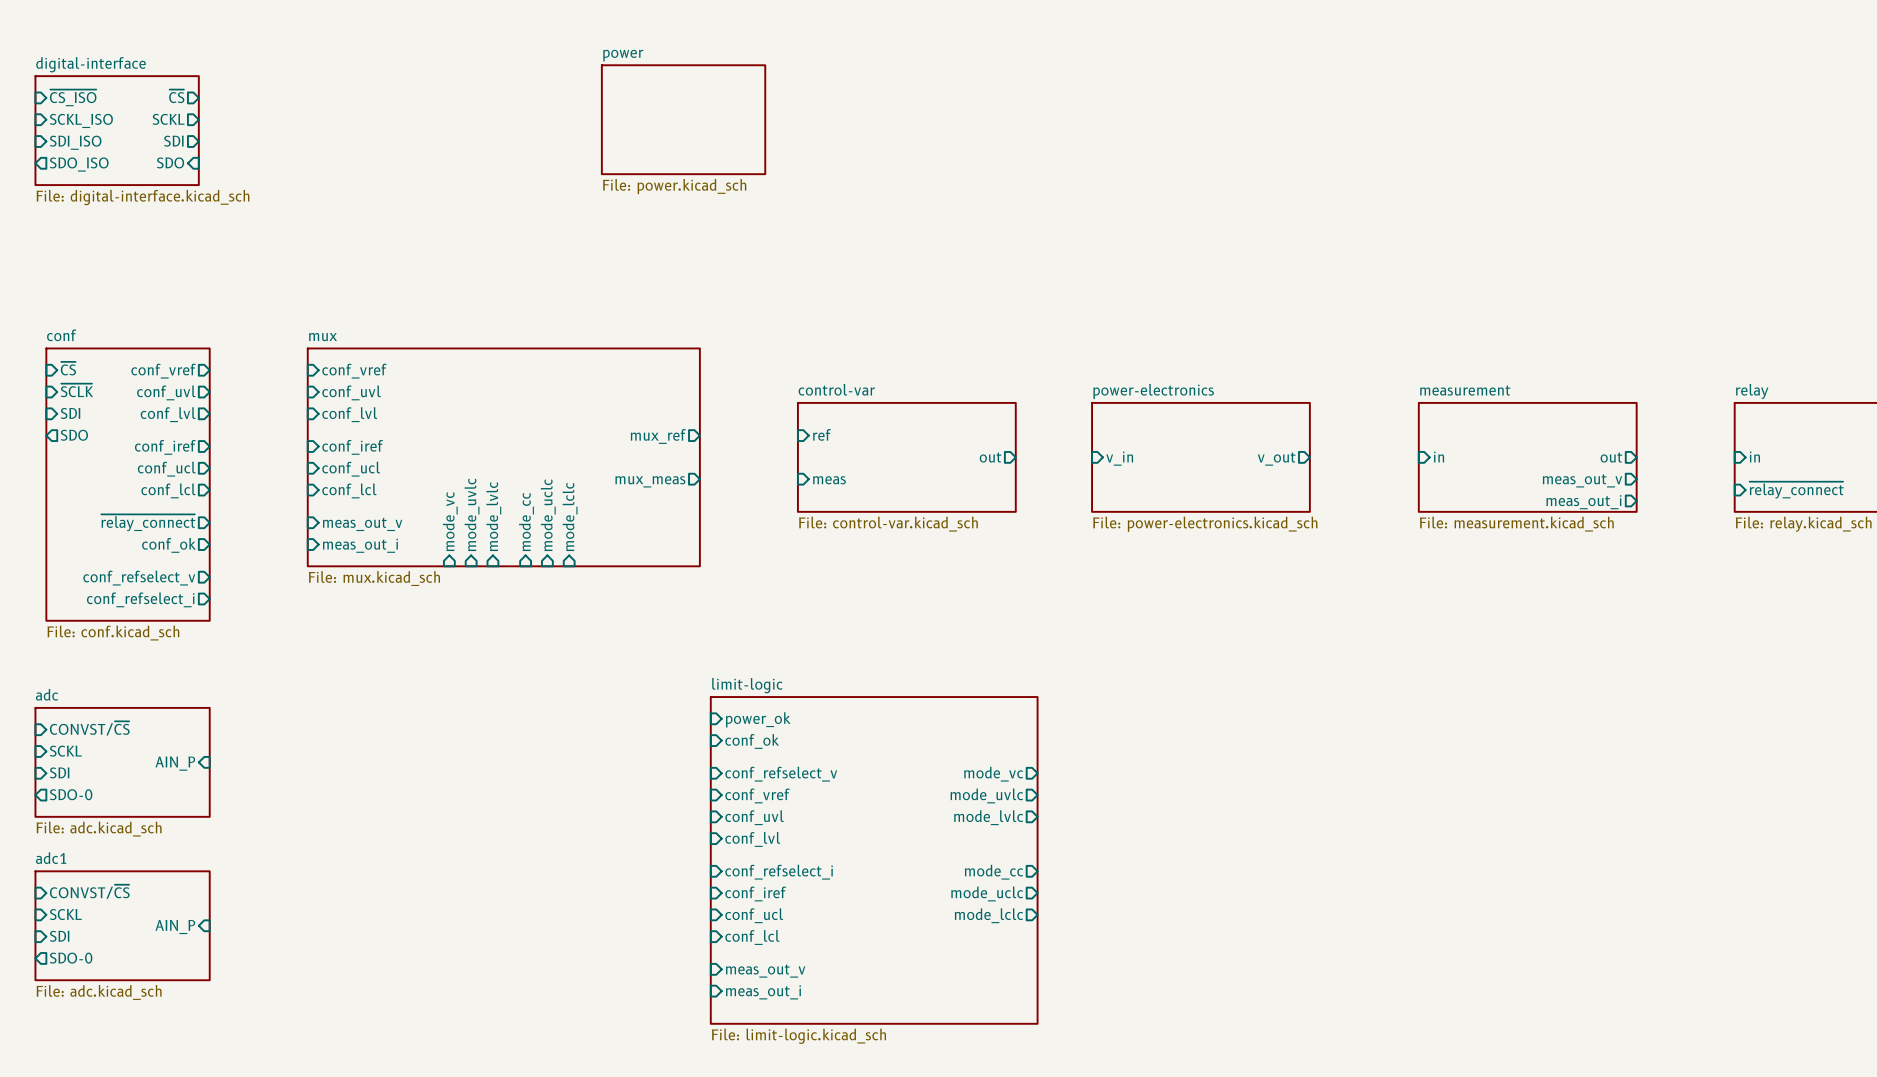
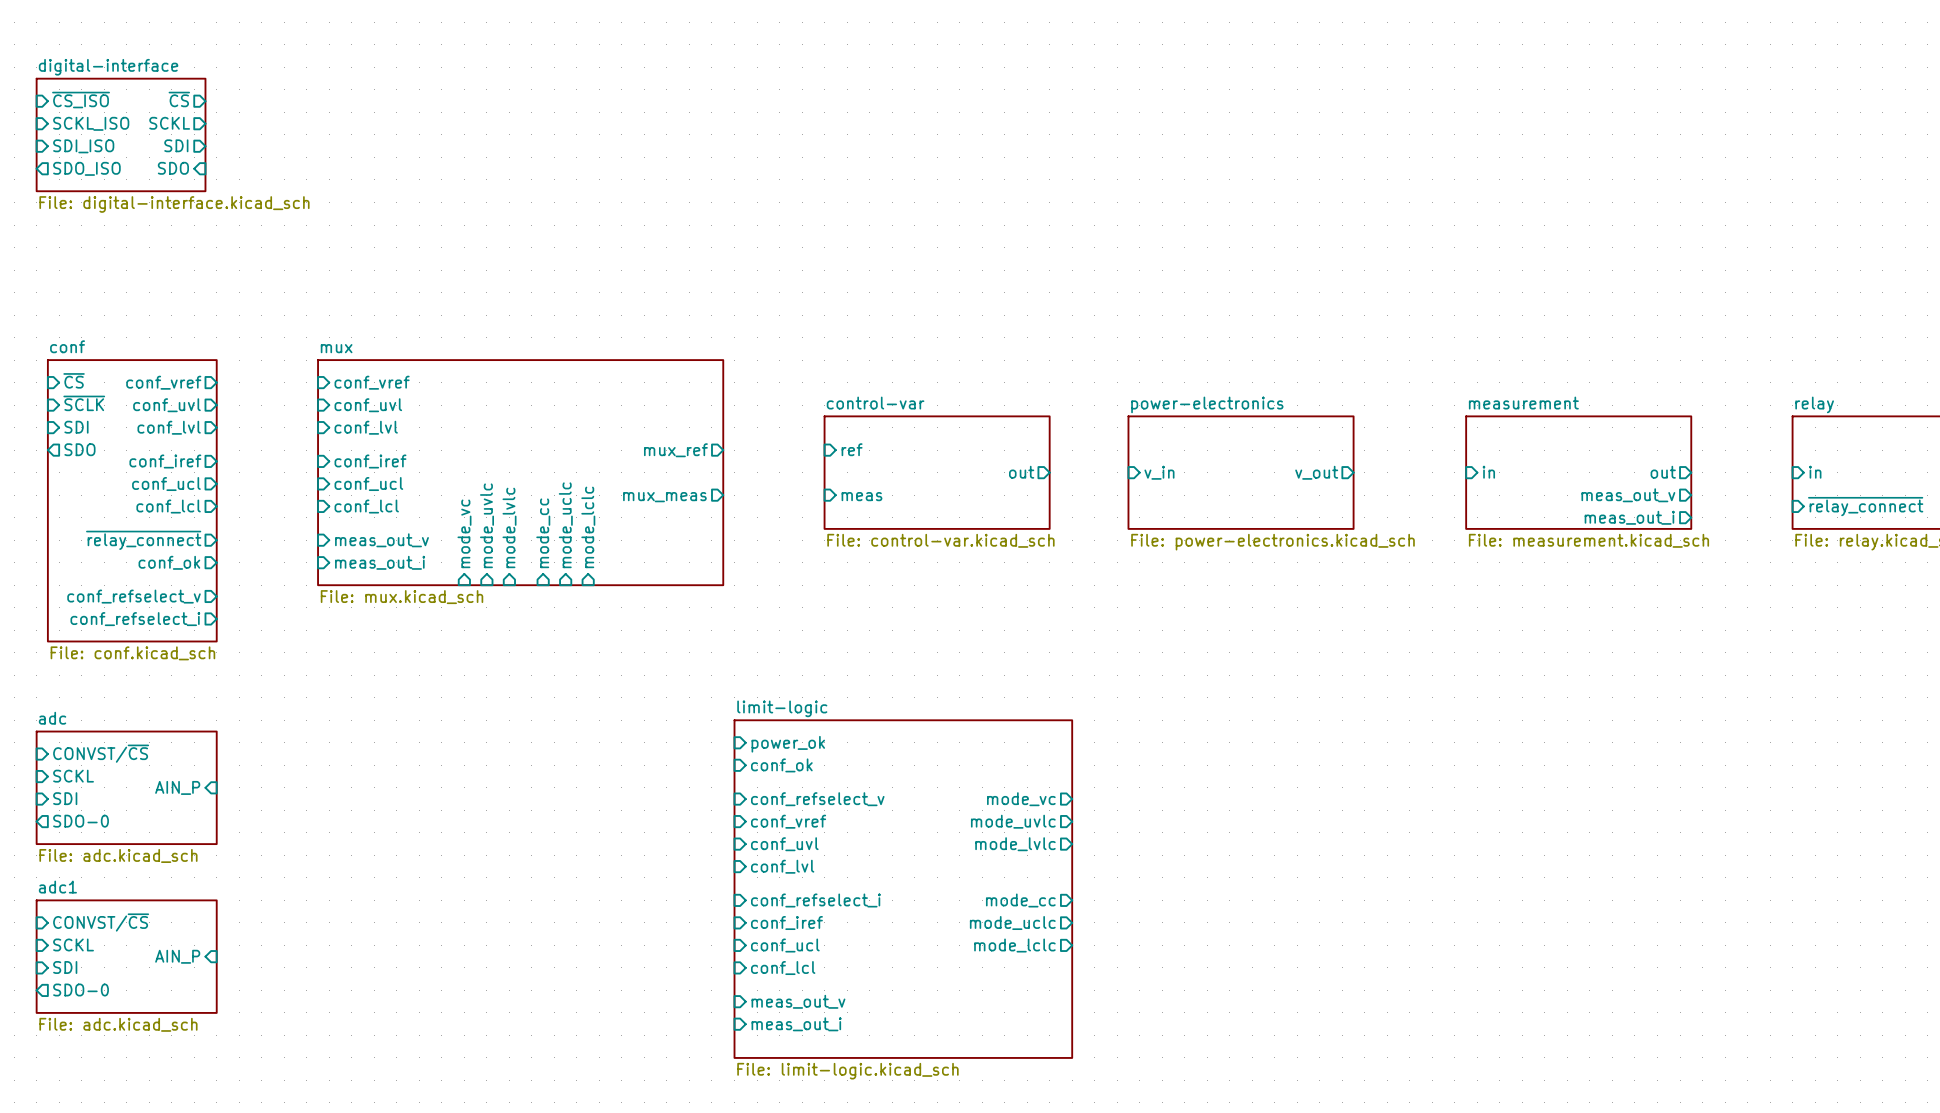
sheet power: File: power.kicad_sch (683, 119) -> none

